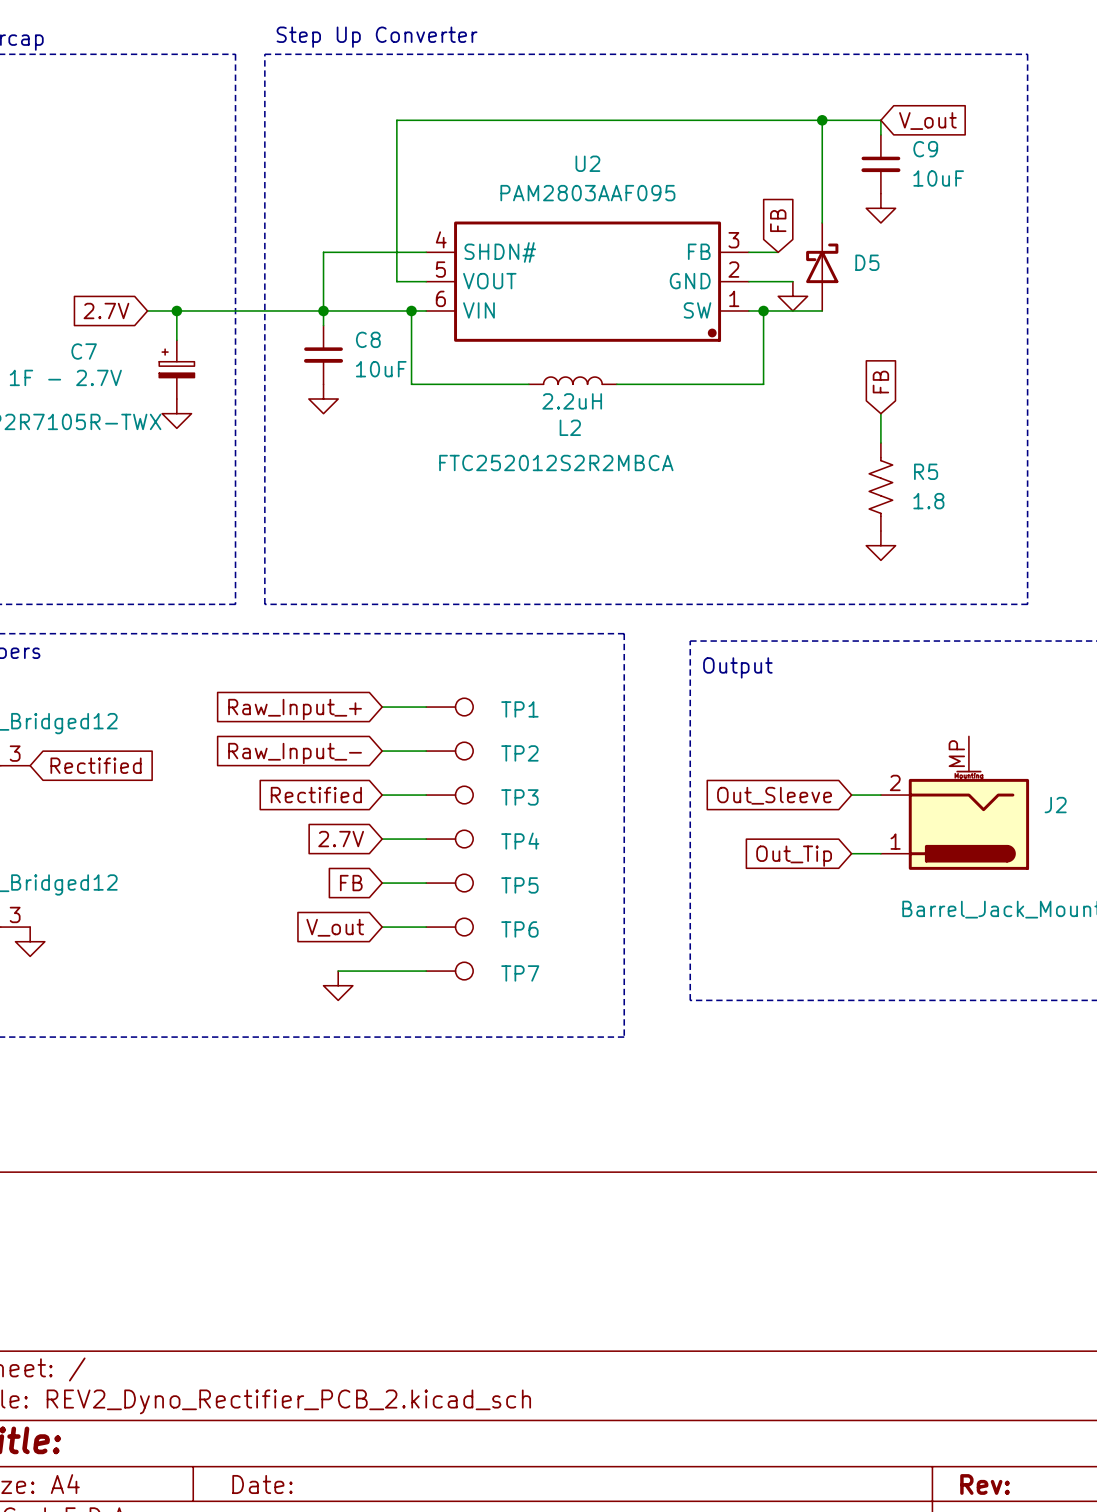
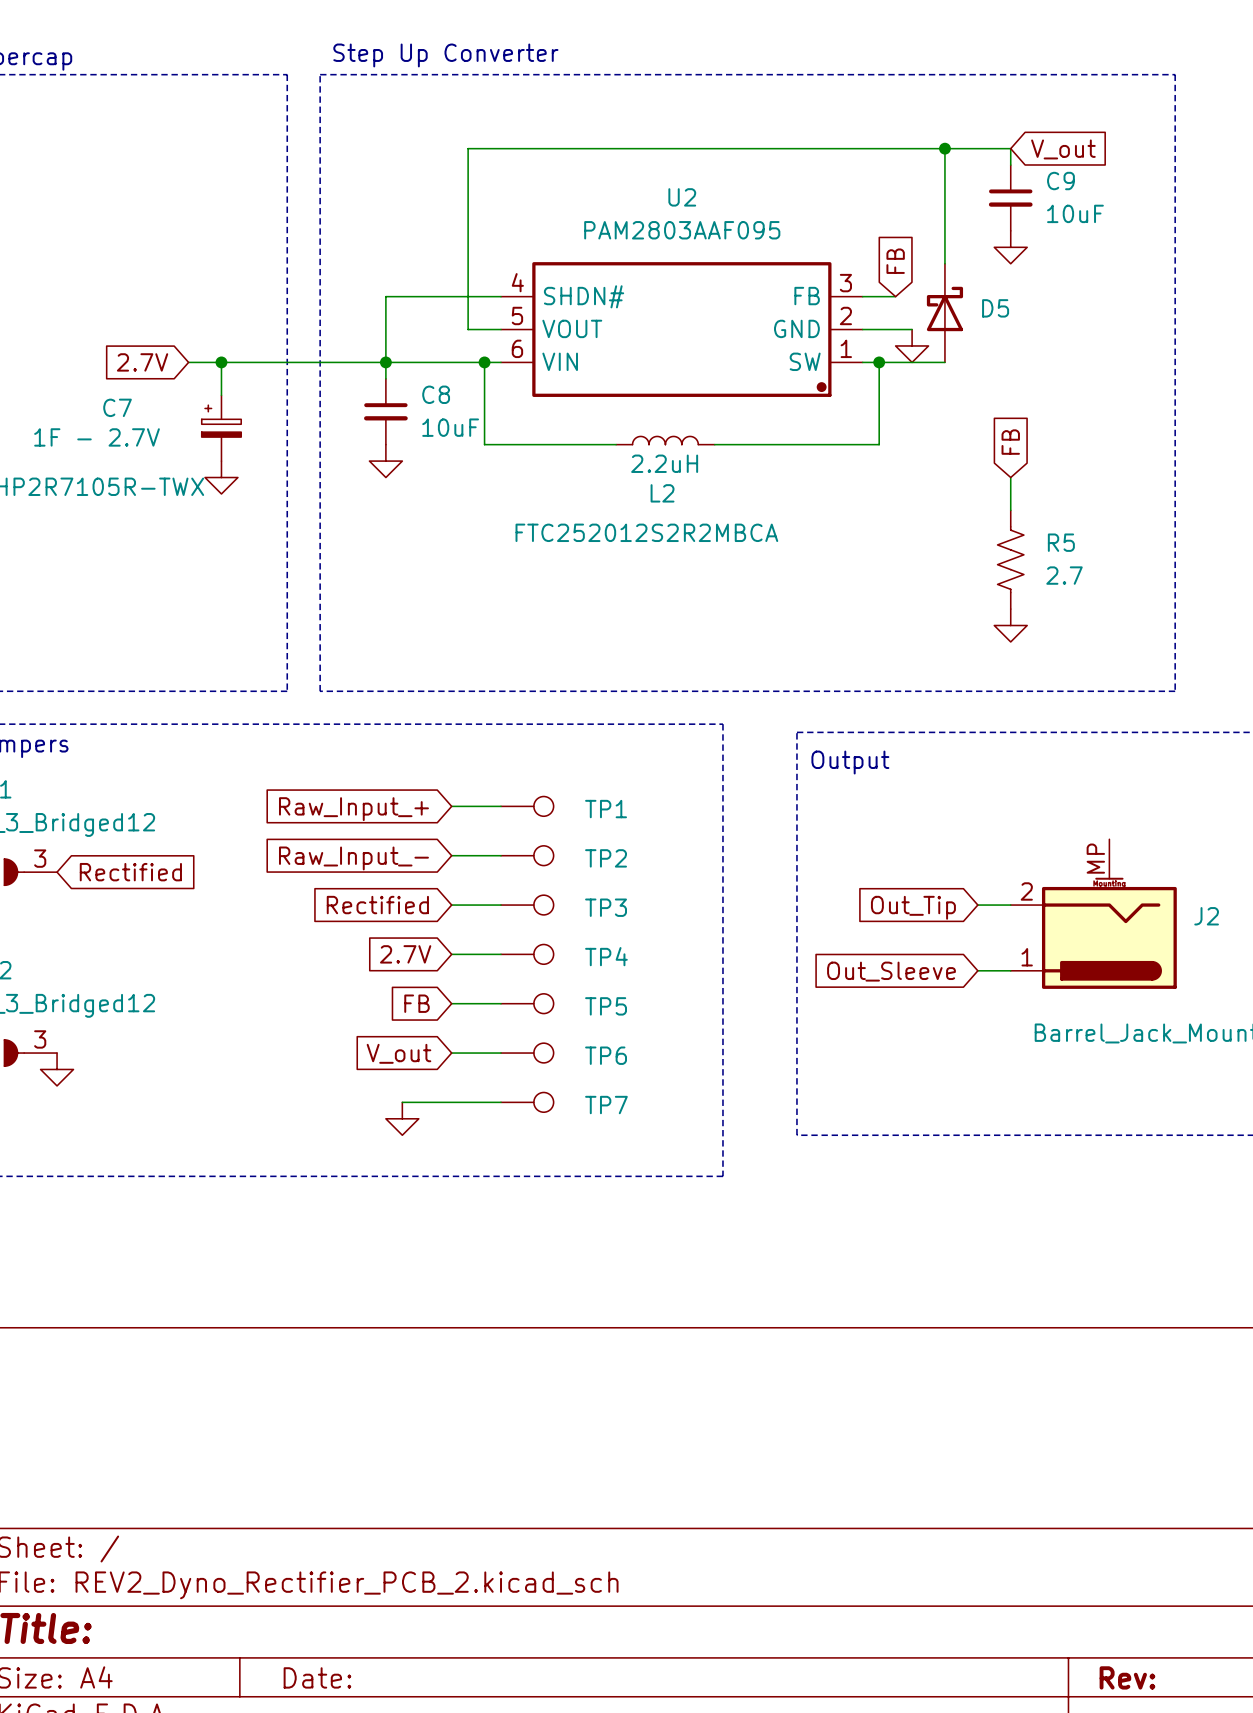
R5 value: 1.8 (928, 501) -> 2.7 (1064, 575)
global label: Out_Sleeve (774, 795) -> Out_Tip (913, 907)
global label: Out_Tip (794, 856) -> Out_Sleeve (891, 971)

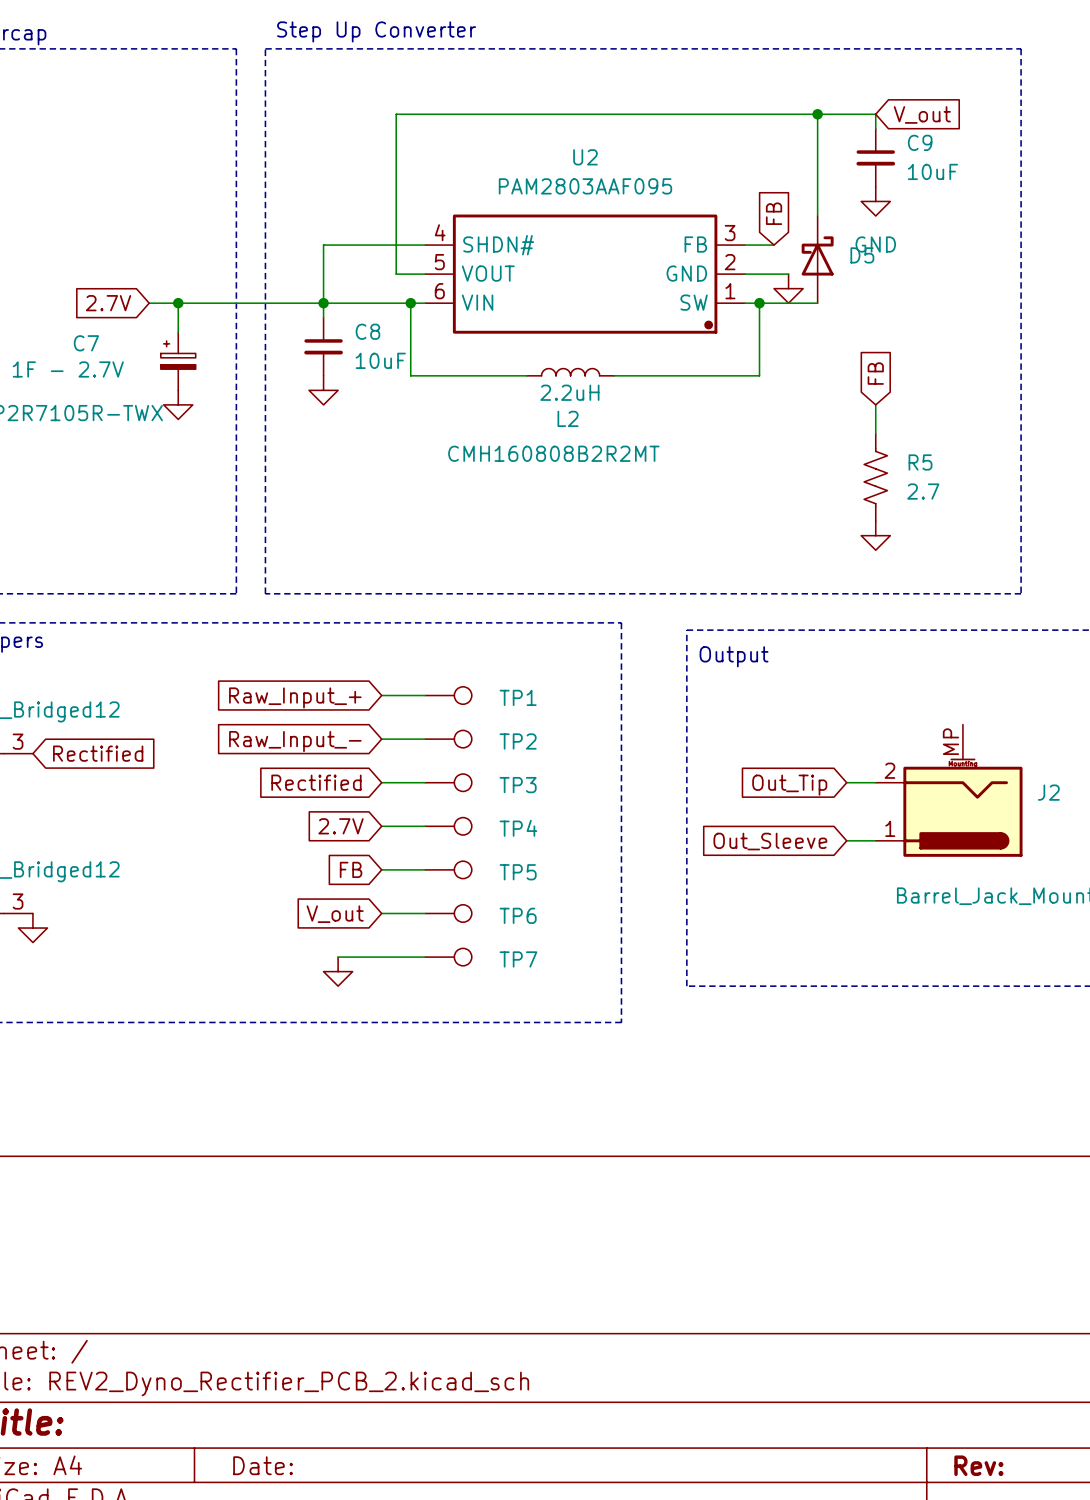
power symbol text: none -> GND (875, 244)
L2 text: FTC252012S2R2MBCA (646, 532) -> CMH160808B2R2MT (553, 453)

